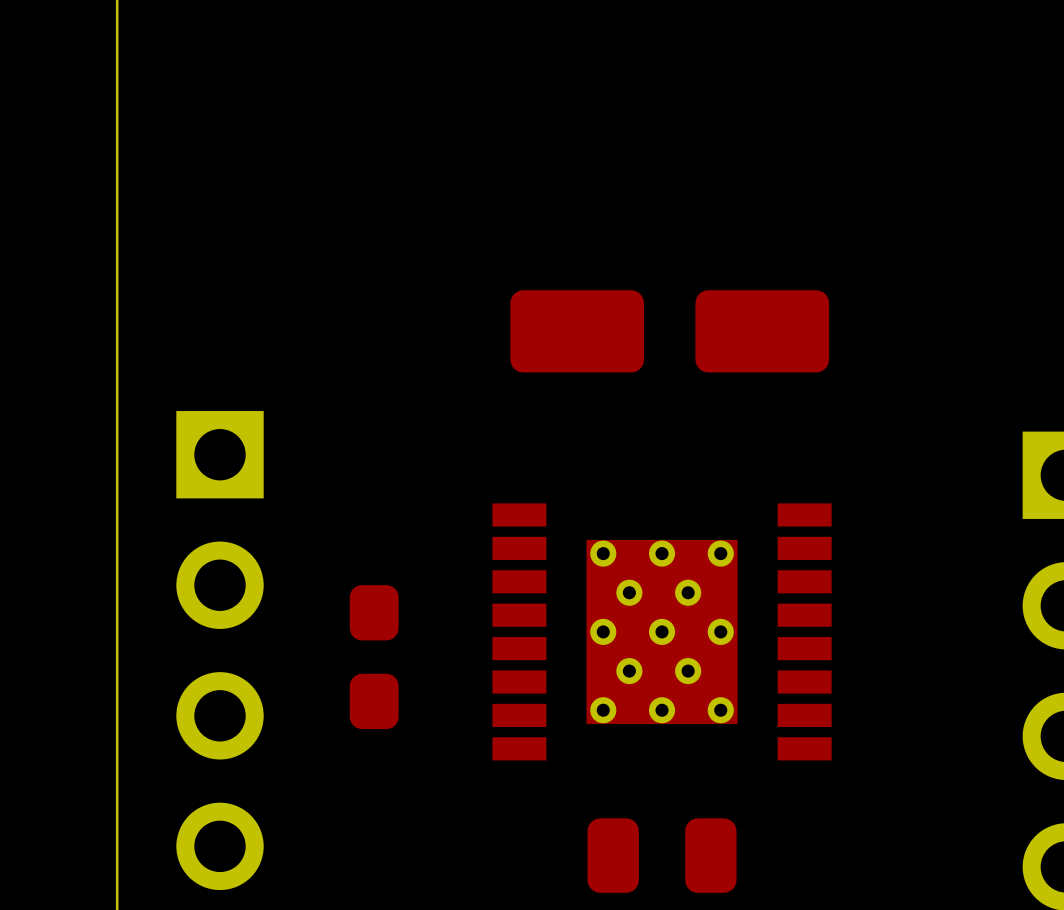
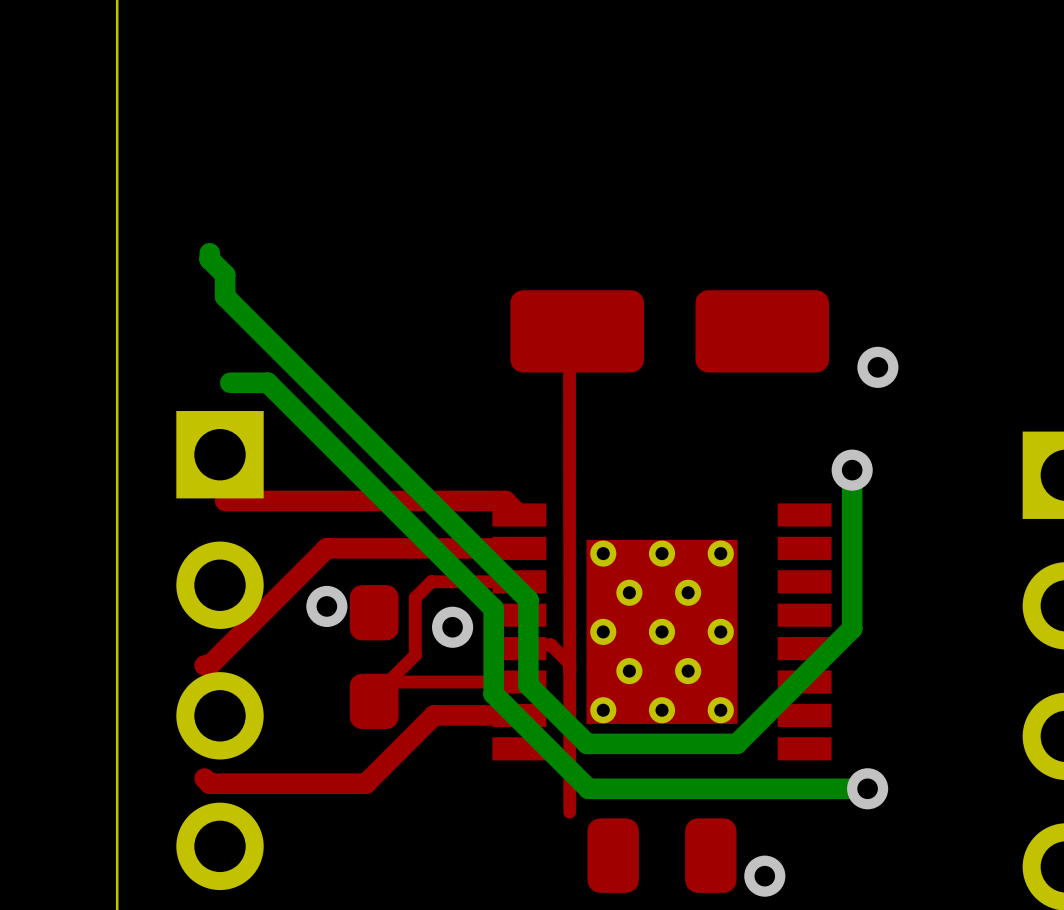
bottom track: none -> (209, 253) (209, 259) (225, 274) (225, 296) (528, 599) (528, 685) (587, 743) (736, 743) (852, 628) (852, 470)
top track: none -> (569, 331) (569, 670)
via: none -> (877, 367)
bottom track: none -> (230, 382) (267, 382) (493, 608) (493, 694) (588, 788) (867, 788)
via: none -> (852, 470)
top track: none -> (225, 500) (505, 500) (519, 514)
top track: none -> (519, 548) (326, 548) (209, 665) (204, 665)
top track: none -> (519, 581) (431, 581) (415, 597) (415, 655) (369, 701)
via: none -> (326, 606)
via: none -> (452, 627)
top track: none -> (512, 644) (550, 644) (569, 663) (569, 812)
top track: none -> (519, 682) (388, 682)
top track: none -> (519, 715) (434, 715) (365, 783) (209, 783) (204, 778)
via: none -> (867, 788)
via: none -> (764, 876)

